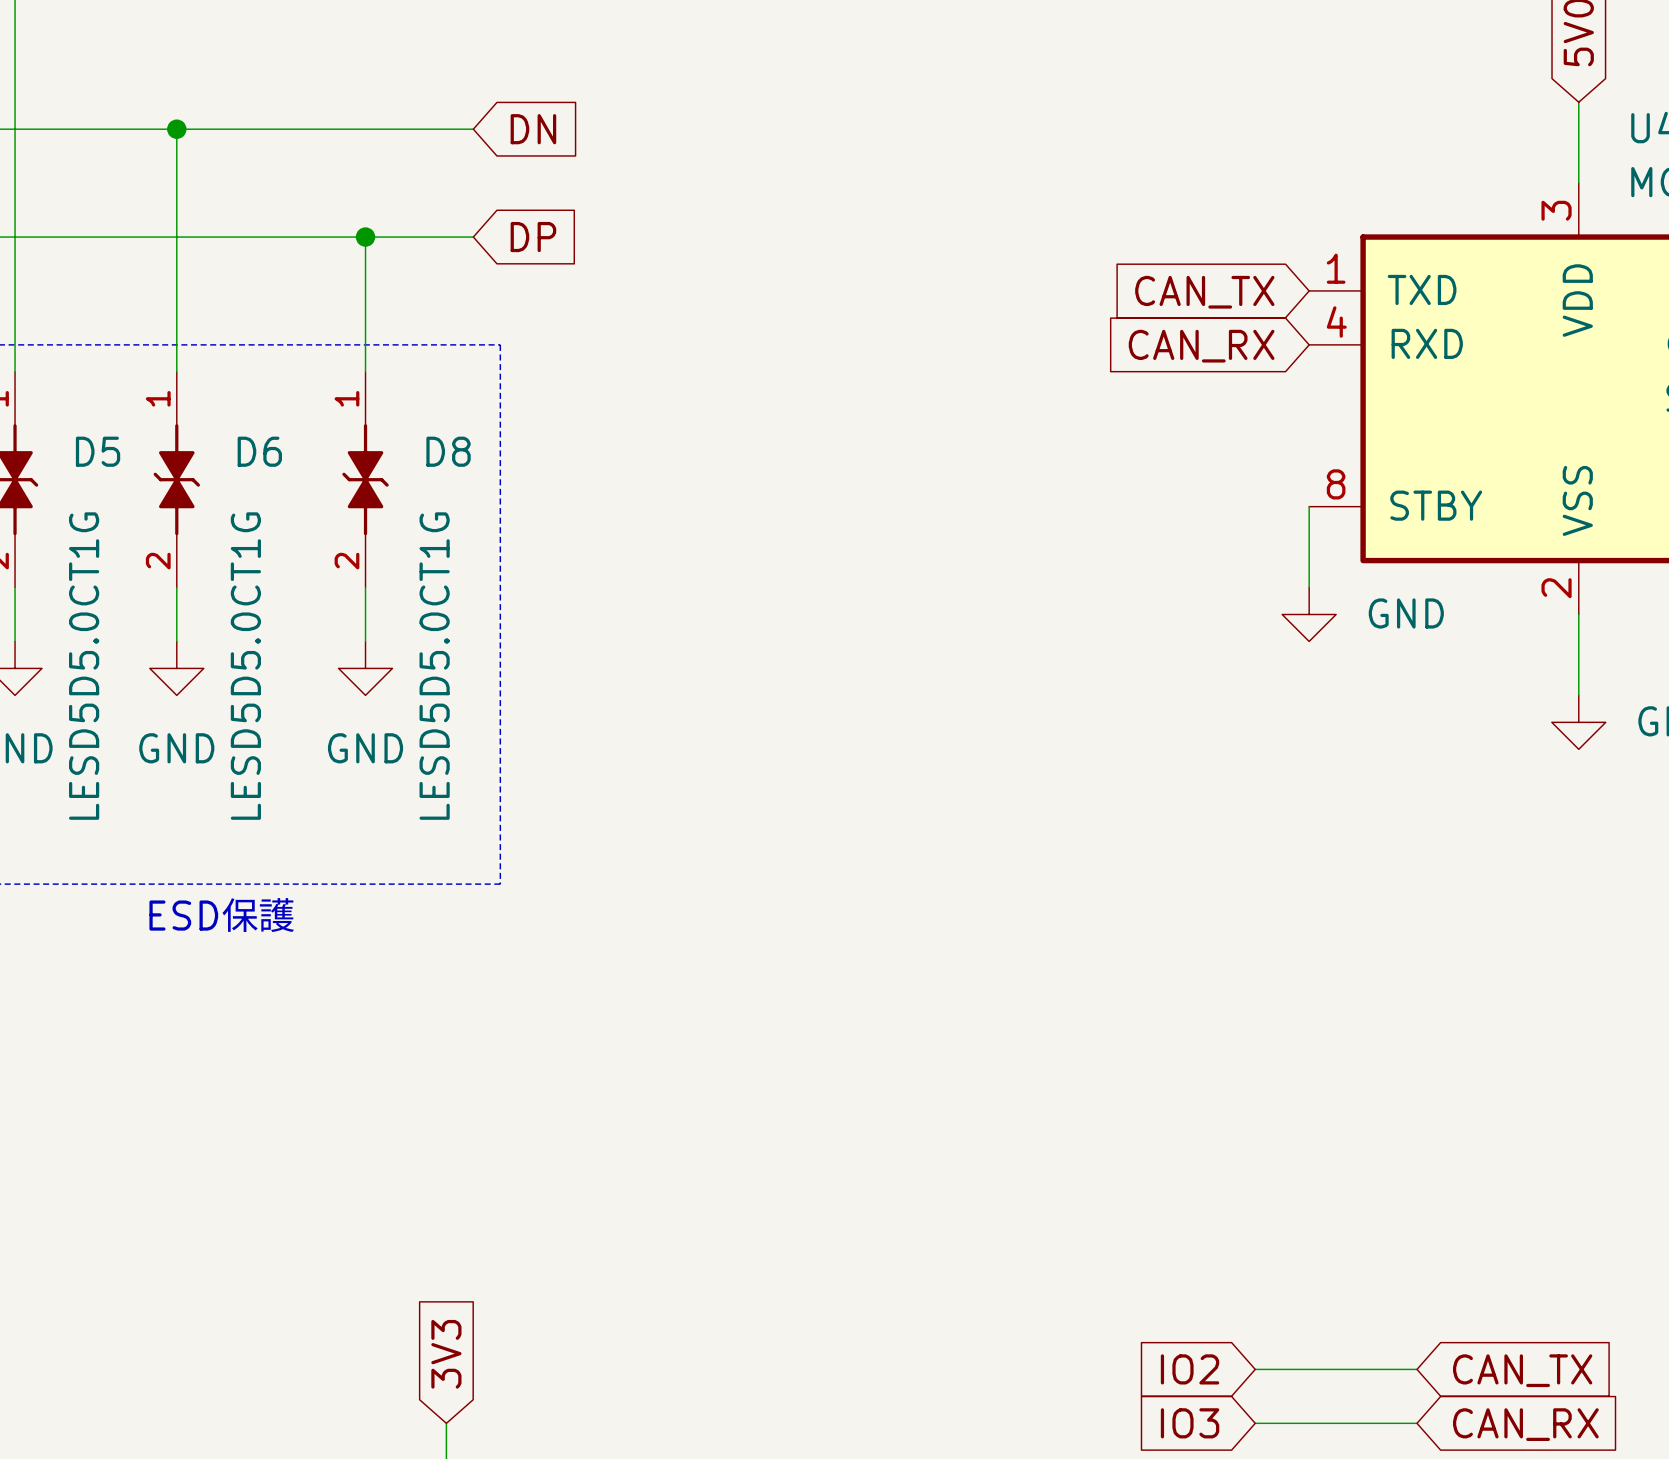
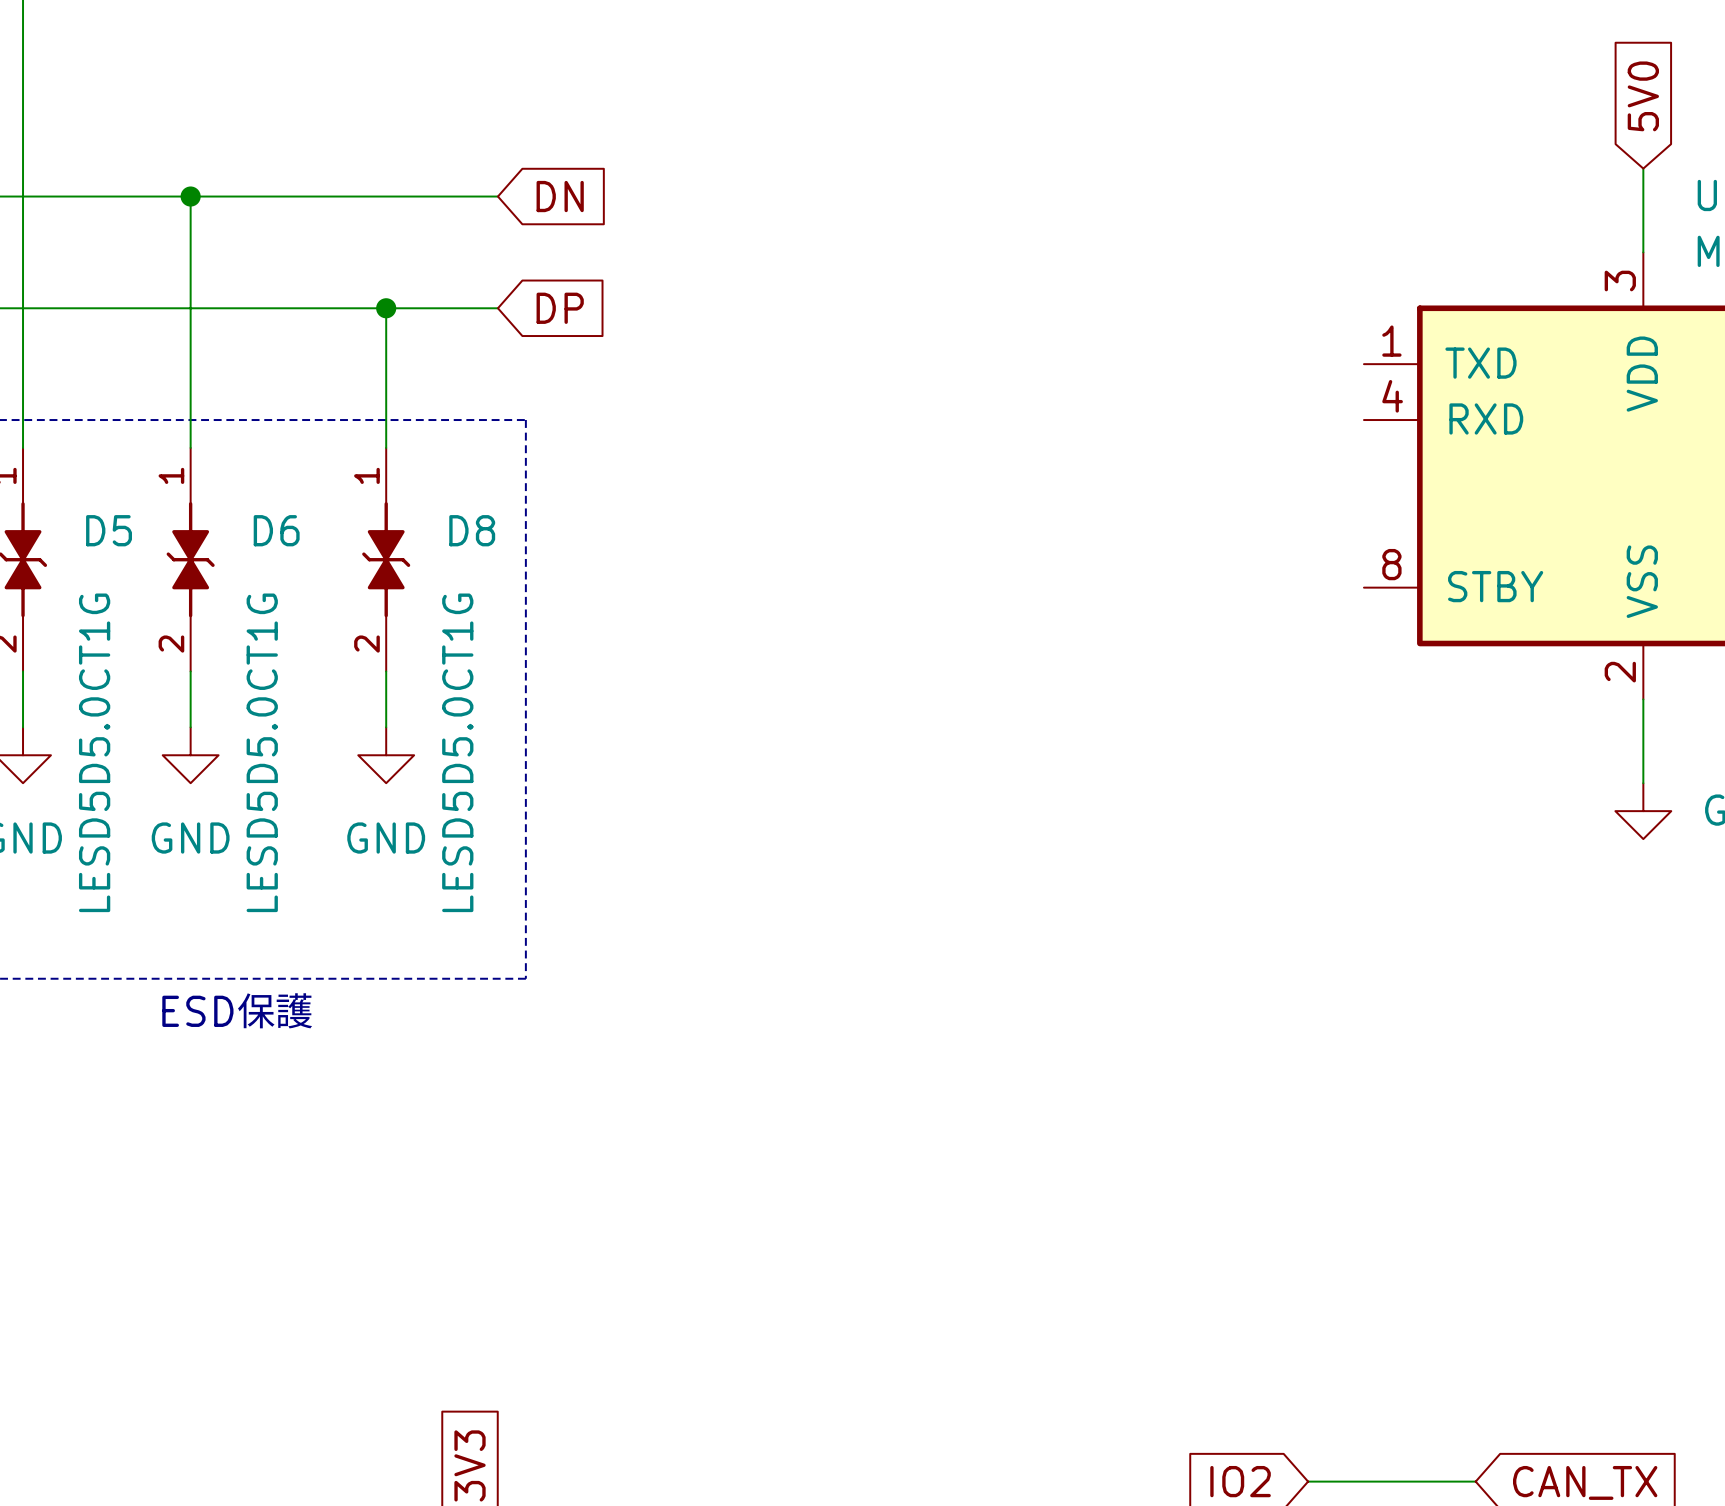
global label: CAN_TX (1204, 292) -> none
global label: CAN_RX (1201, 346) -> none
wire: (1309, 506) (1309, 587) -> none
power symbol: GND (1309, 614) -> none

